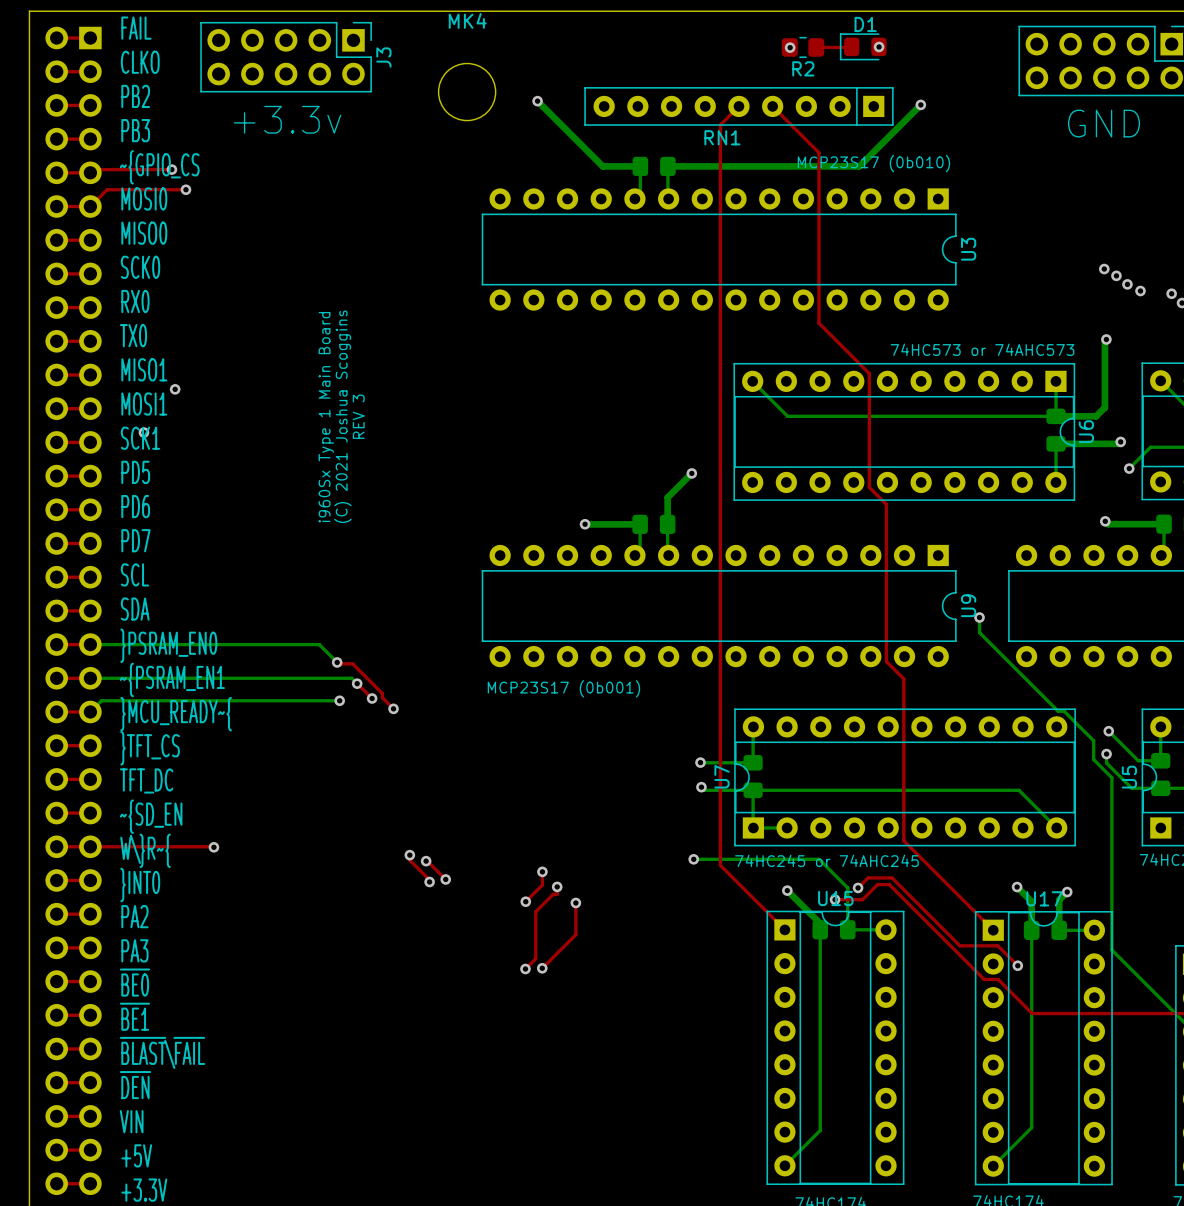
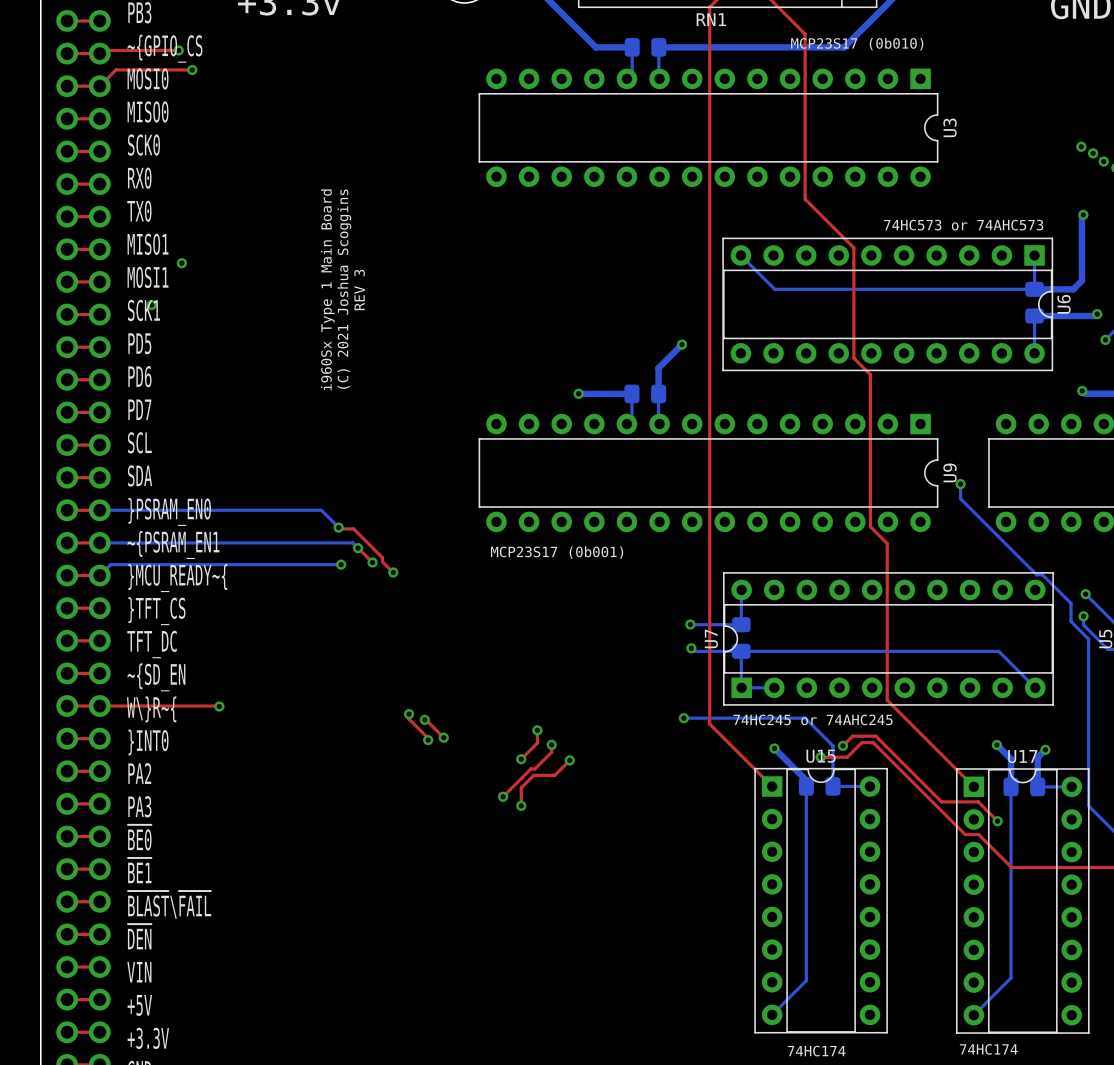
top track: (557, 894) (553, 894) (535, 911) (535, 958) (525, 969) -> (551, 752) (534, 768) (530, 768) (503, 796)
top track: (575, 902) (575, 934) (542, 968) -> (569, 760) (554, 775) (533, 775) (521, 787) (521, 805)
via: none -> (503, 796)
via: none -> (521, 805)
via: (542, 968) -> none
via: (525, 969) -> none

